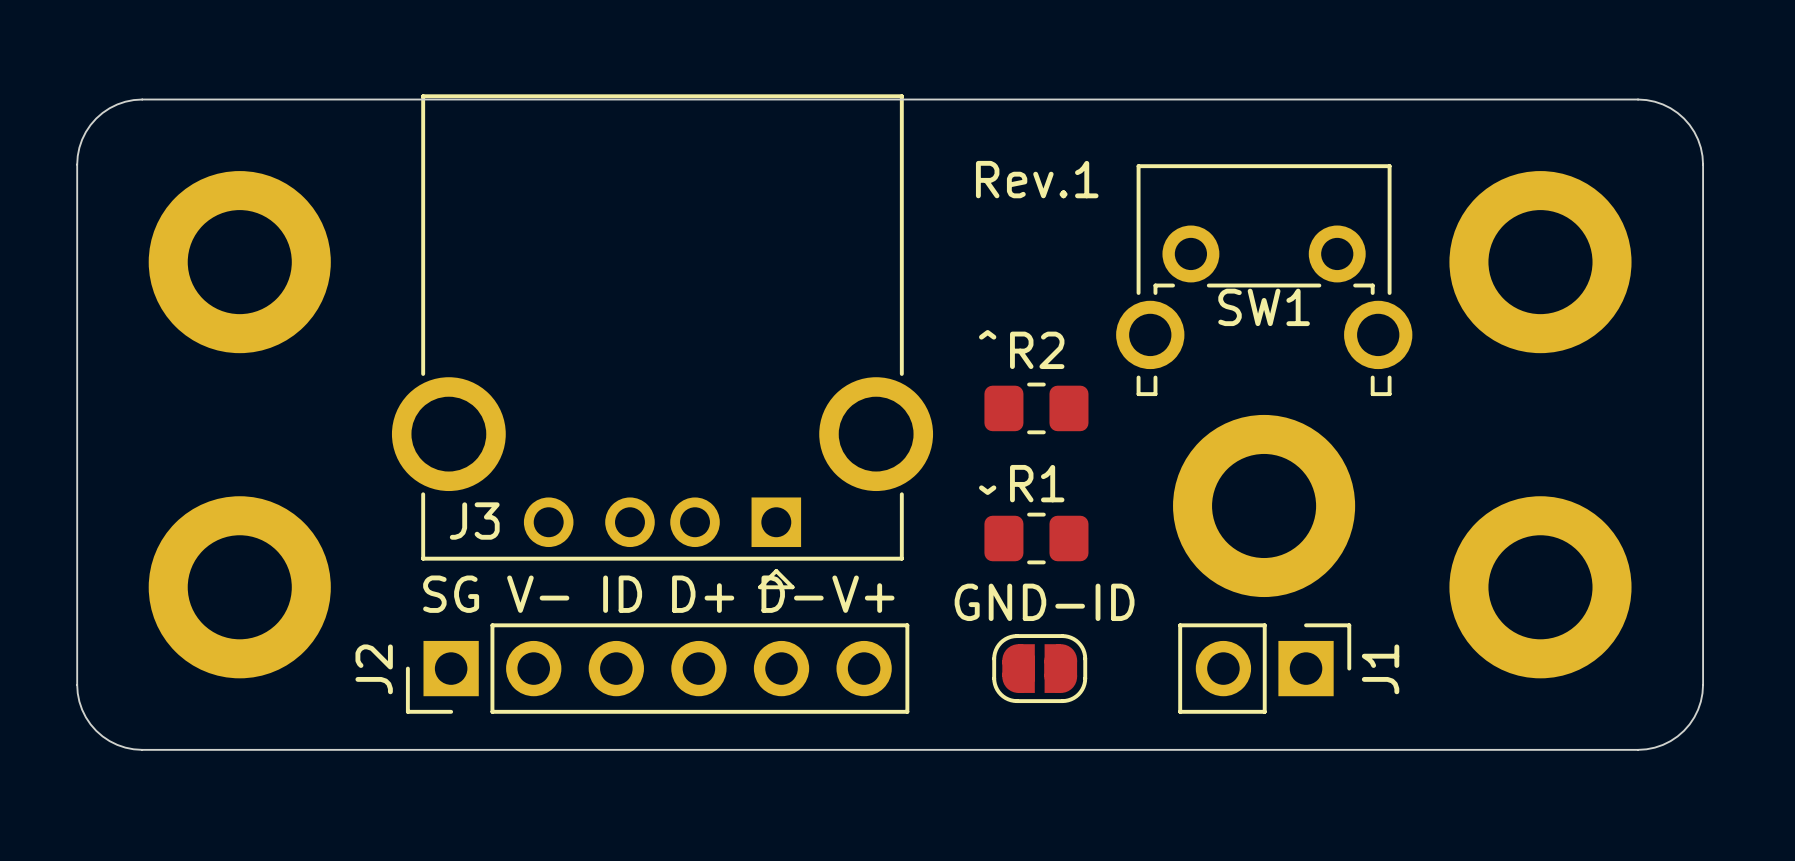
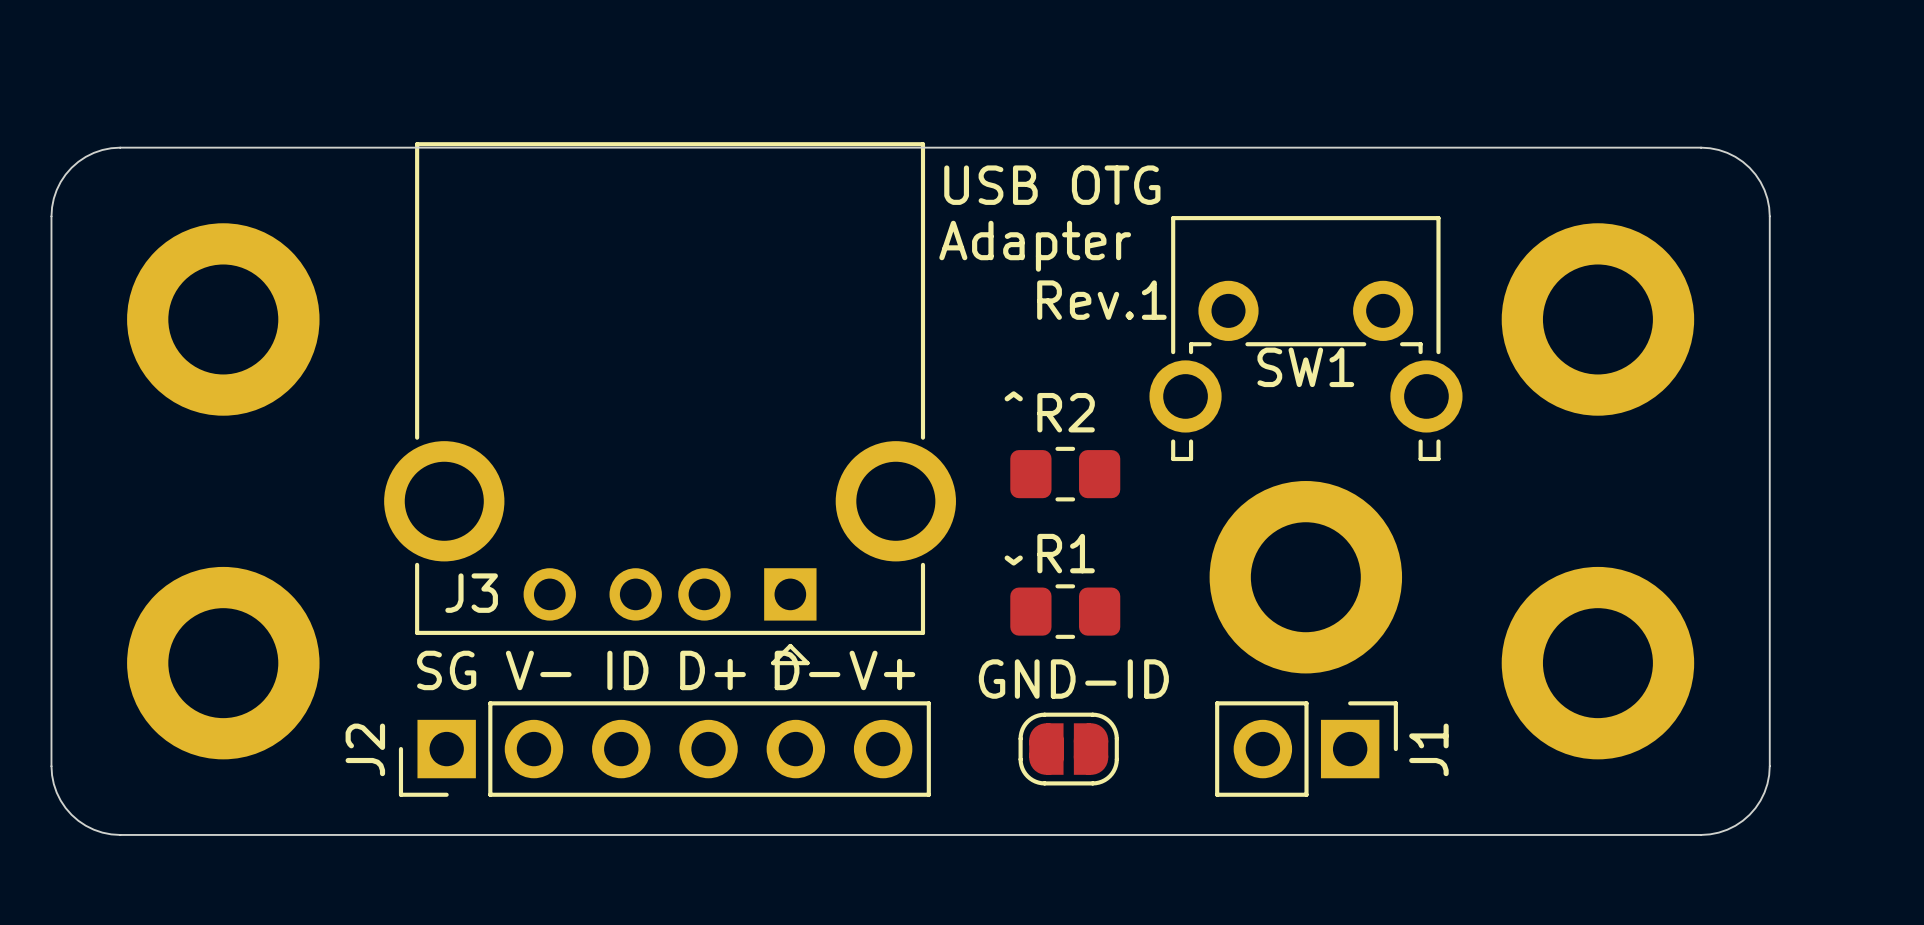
text: none -> USB OTG (1052, 185)
text position: Rev.1 (1037, 179) -> Rev.1 (1101, 300)
text: none -> Adapter (1035, 246)

